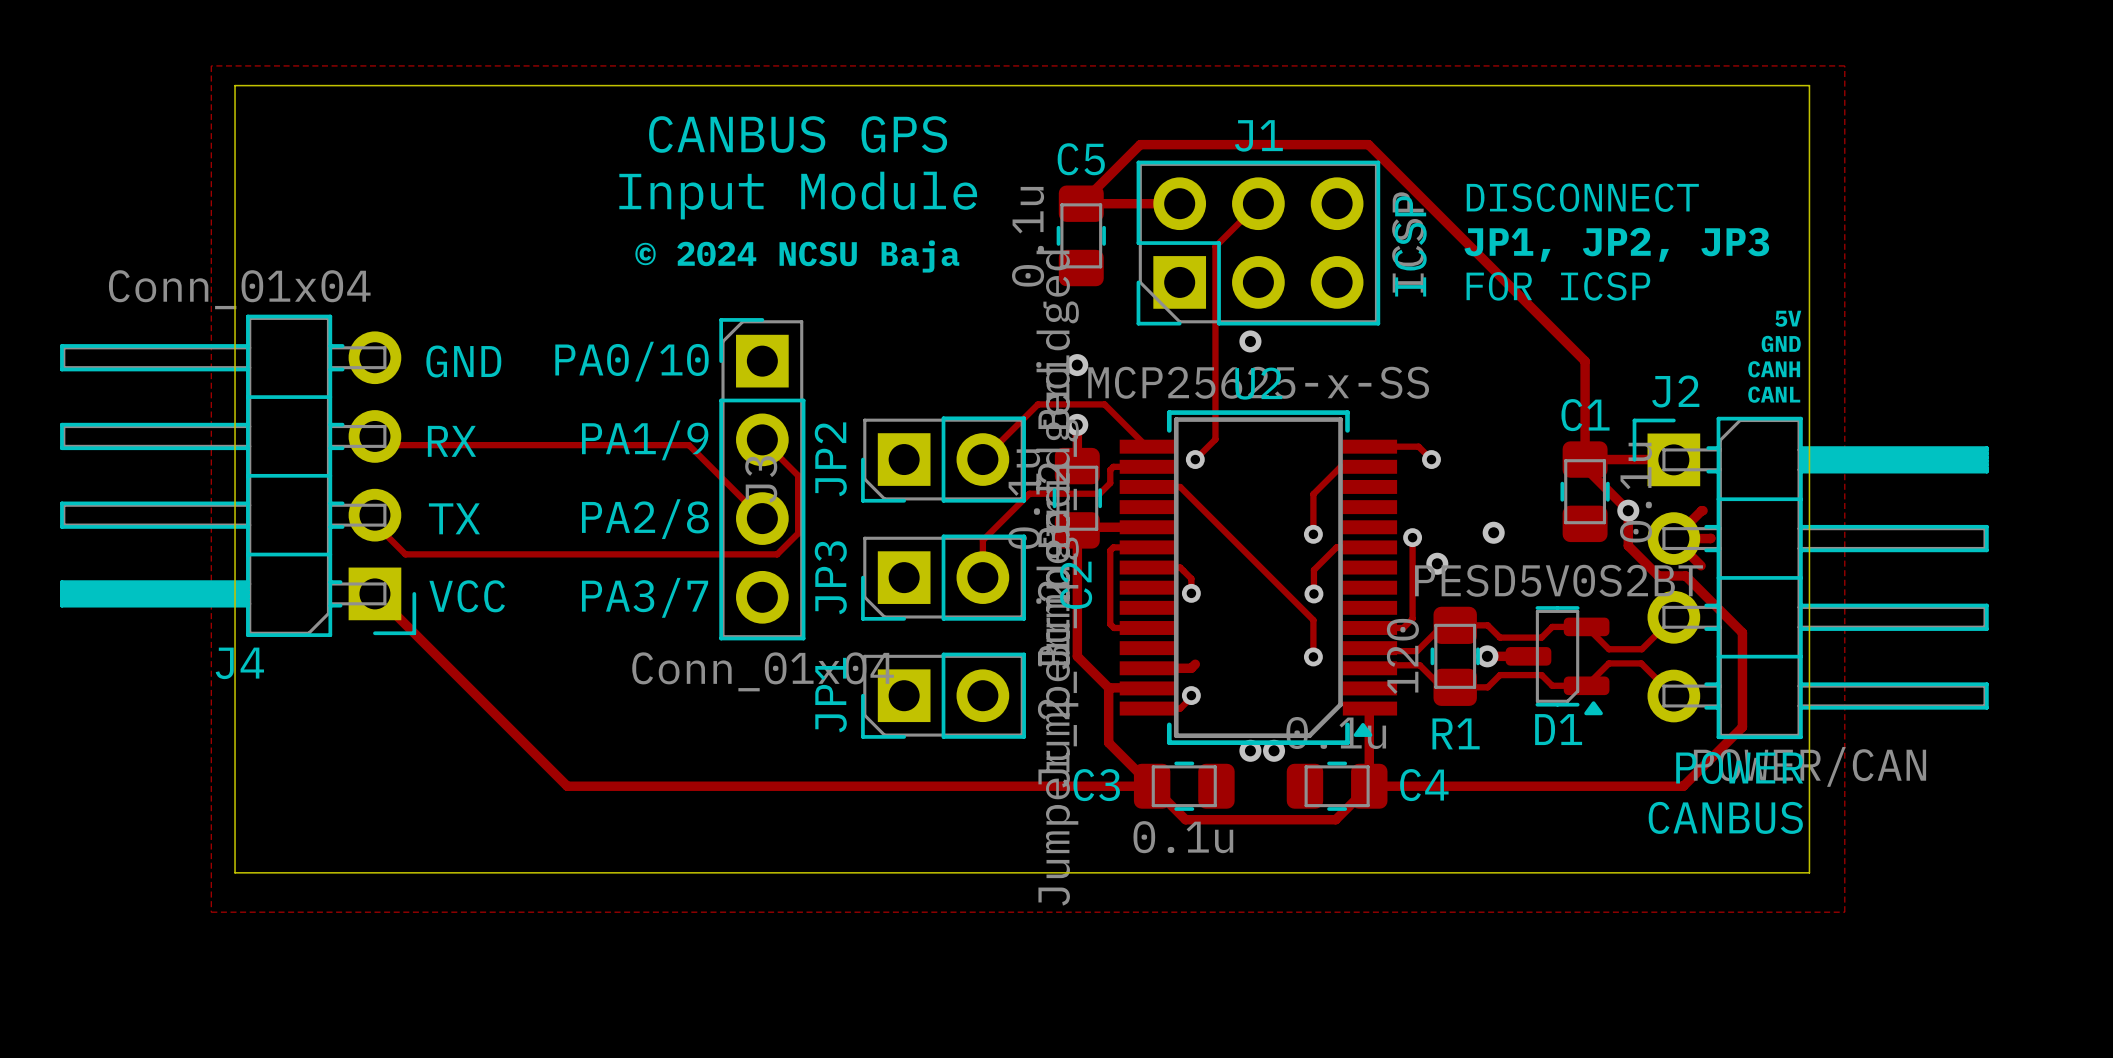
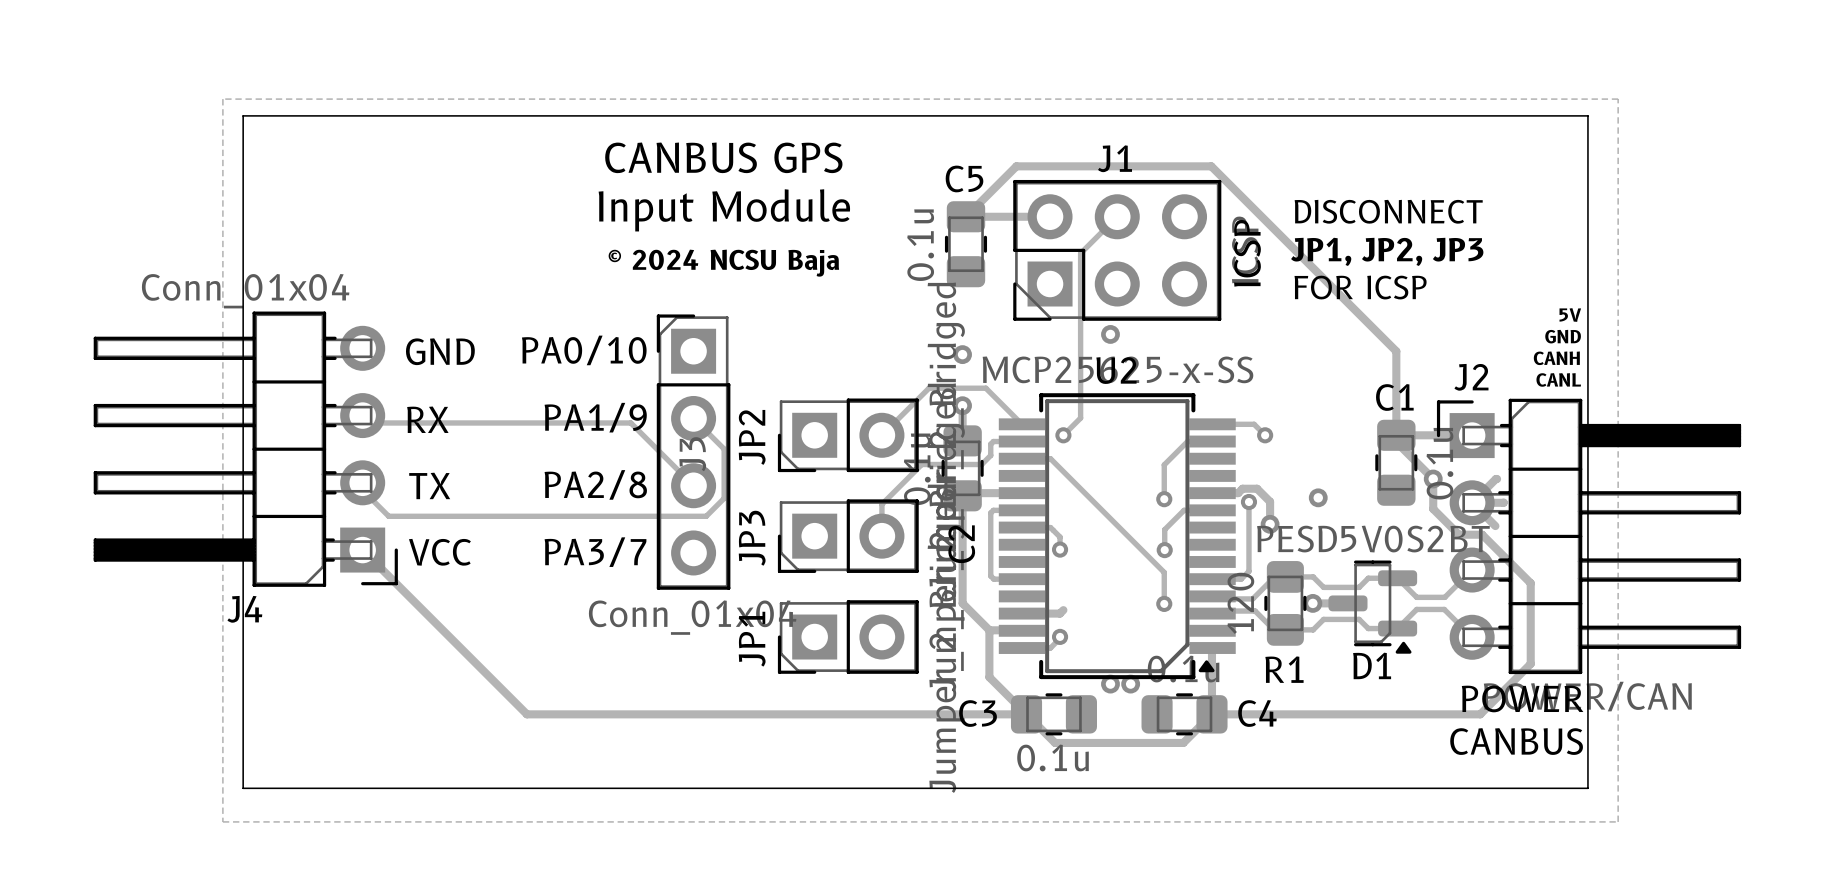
track: none -> (1212, 493) (1238, 493) (1242, 488) (1257, 488) (1270, 501) (1270, 524)

